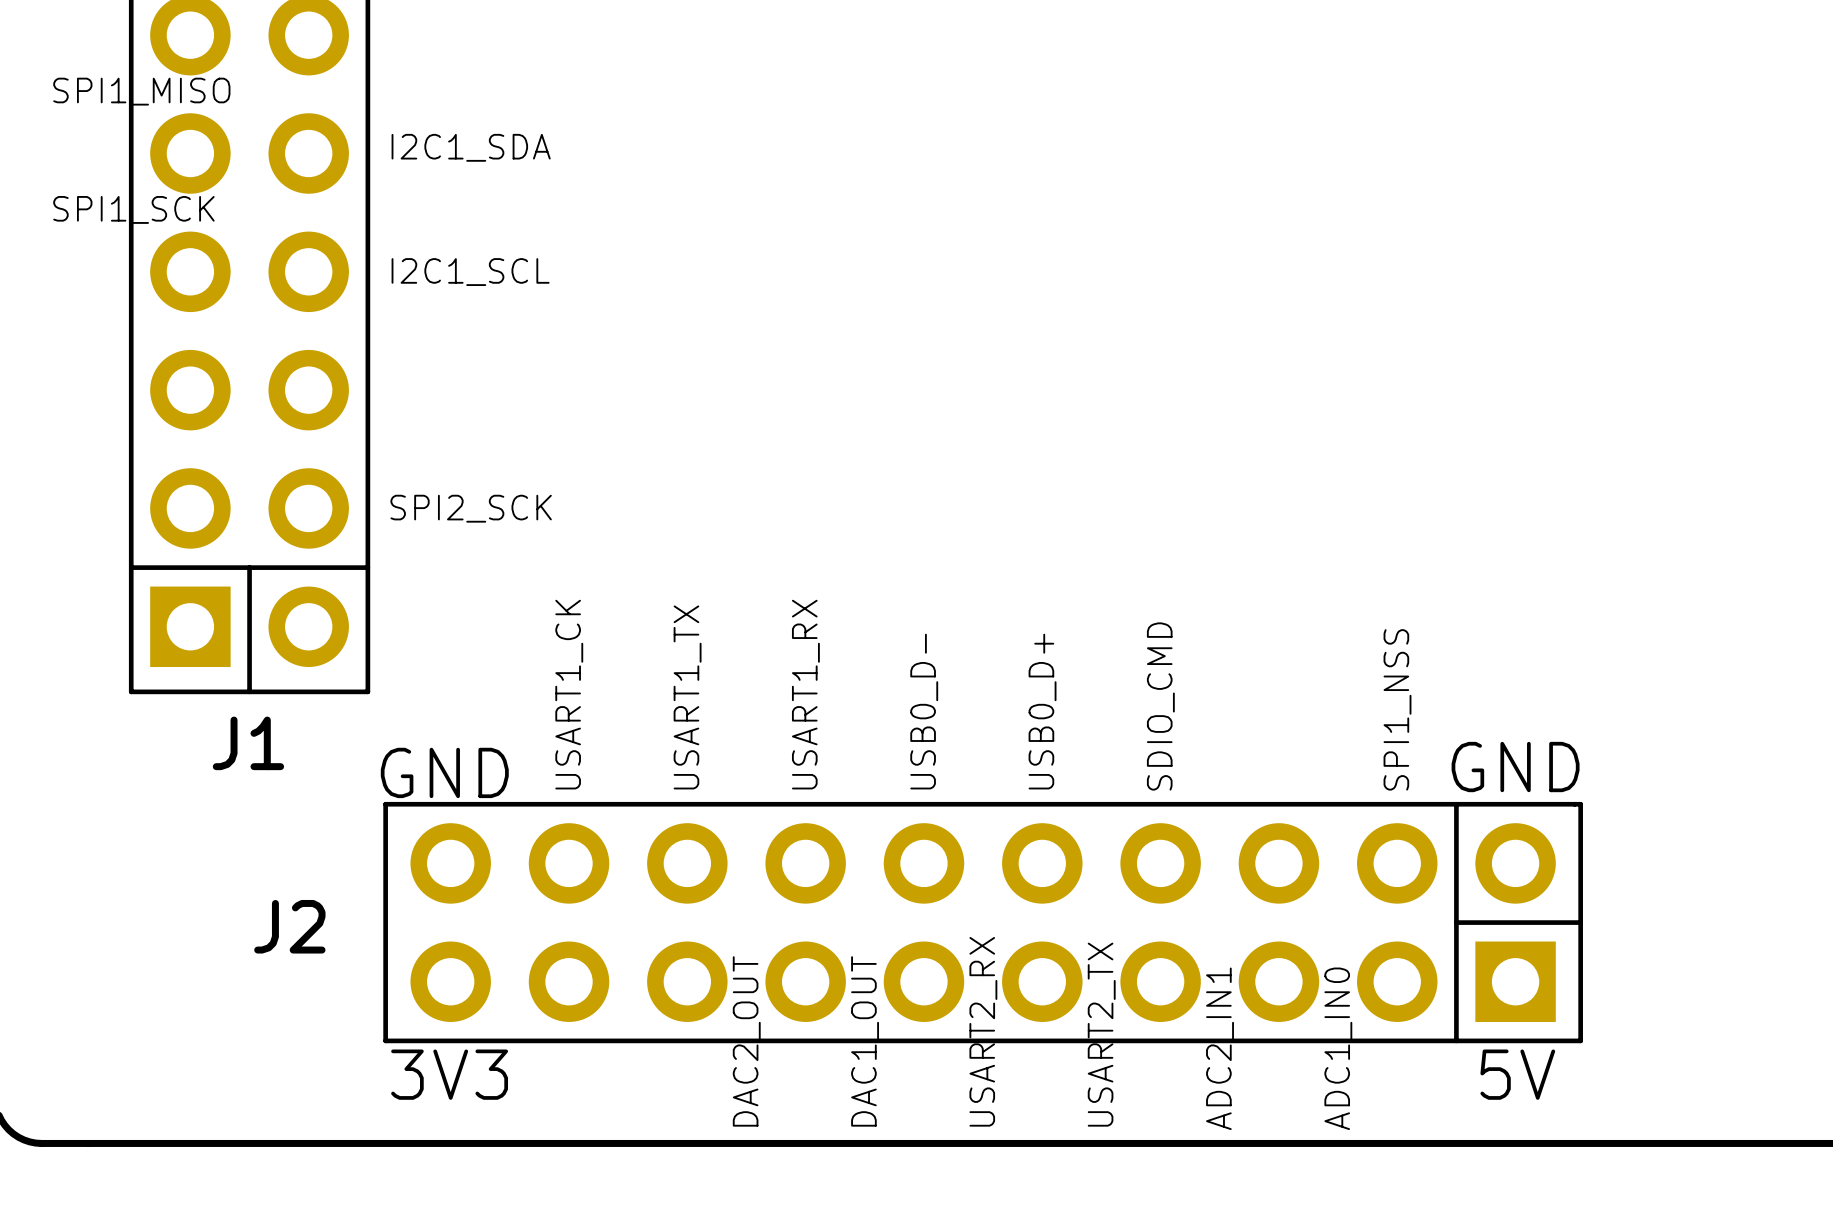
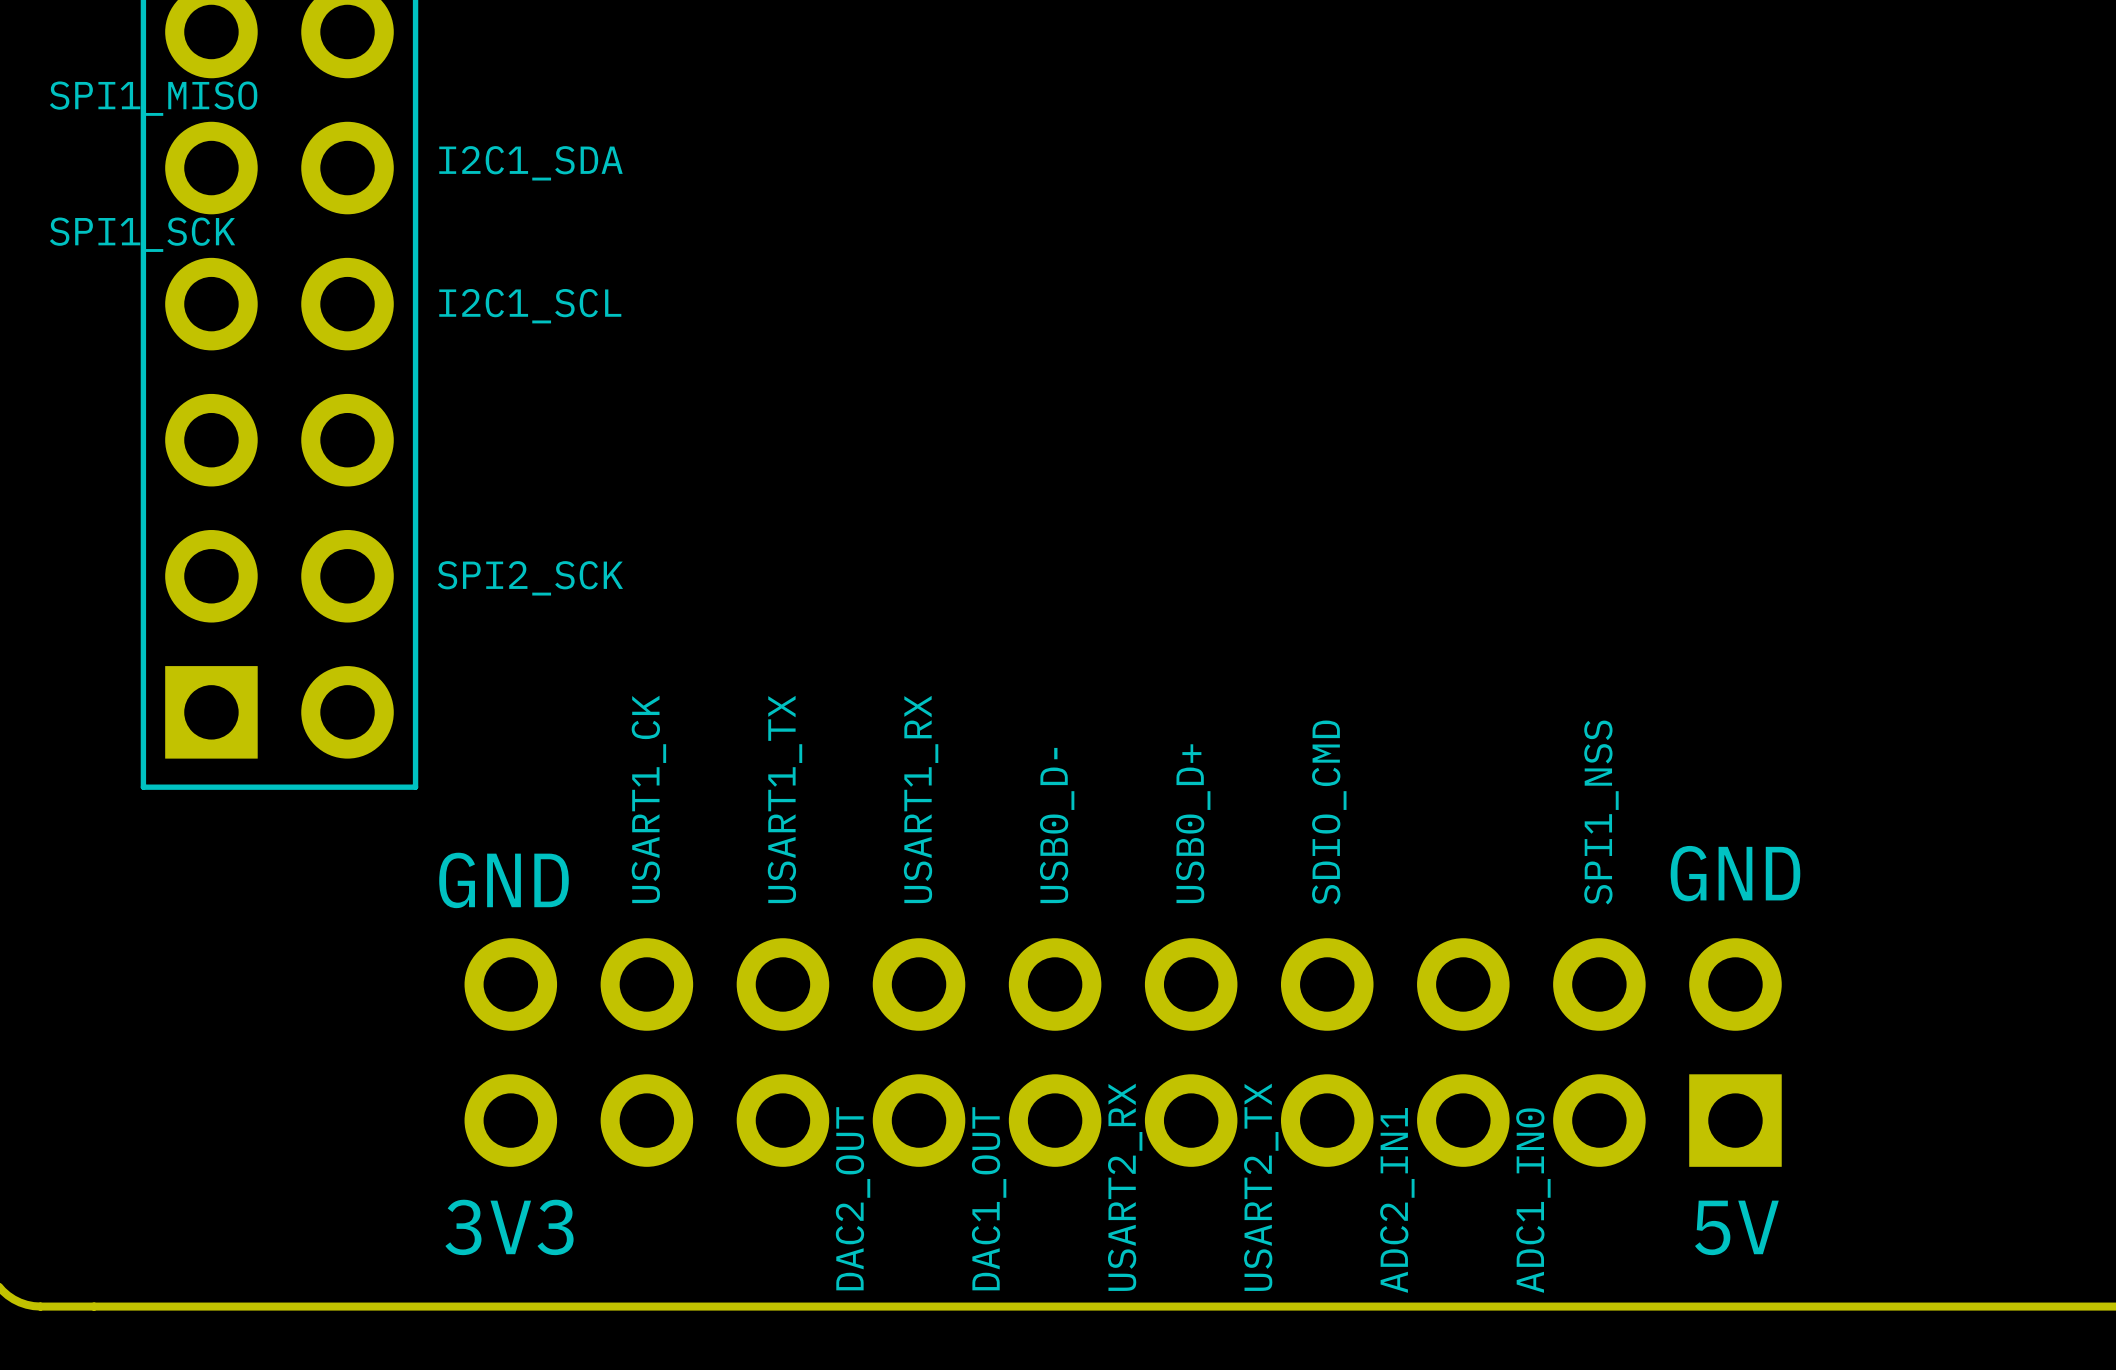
line: (249, 567) (249, 691) -> none
line: (367, 567) (131, 567) -> none
text: J1 (248, 743) -> none
line: (1456, 804) (1456, 1040) -> none
line: (1580, 804) (385, 804) (385, 1040) (1580, 1040) (1580, 804) -> none
line: (1580, 922) (1456, 922) -> none
text: J2 (289, 926) -> none

